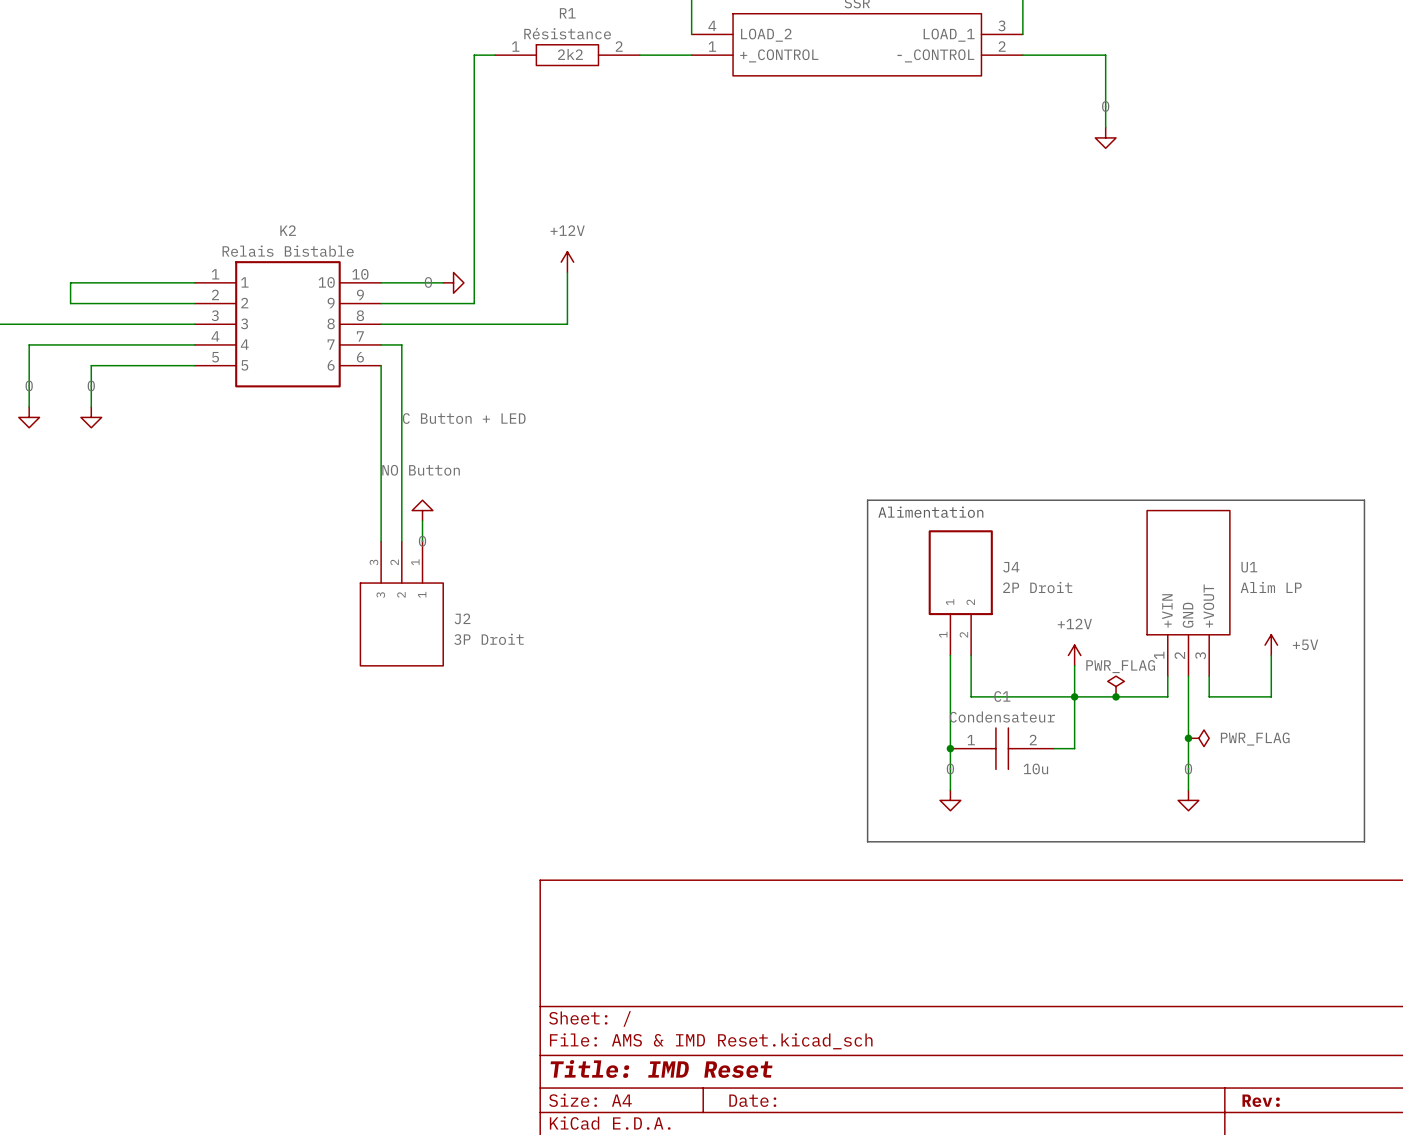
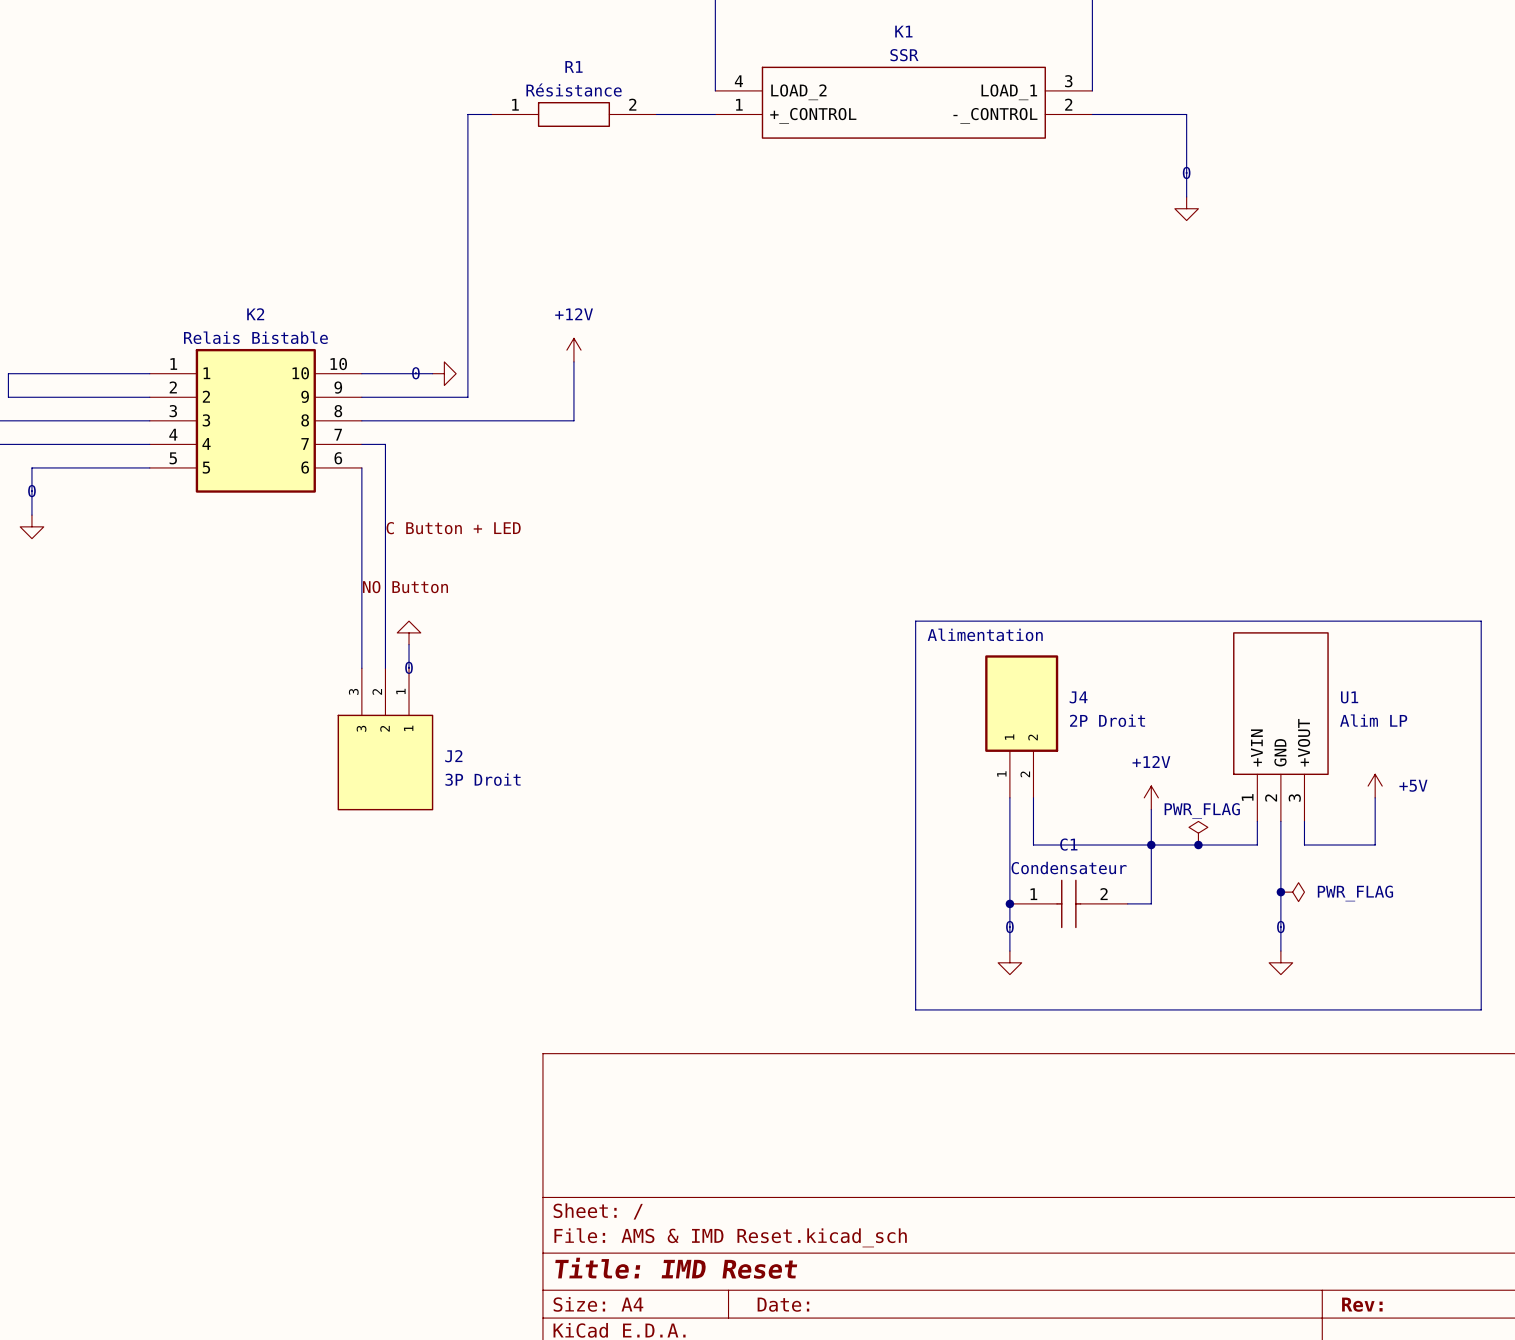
R1 value: 2k2 (570, 54) -> none
C1 value: 10u (1035, 768) -> none

